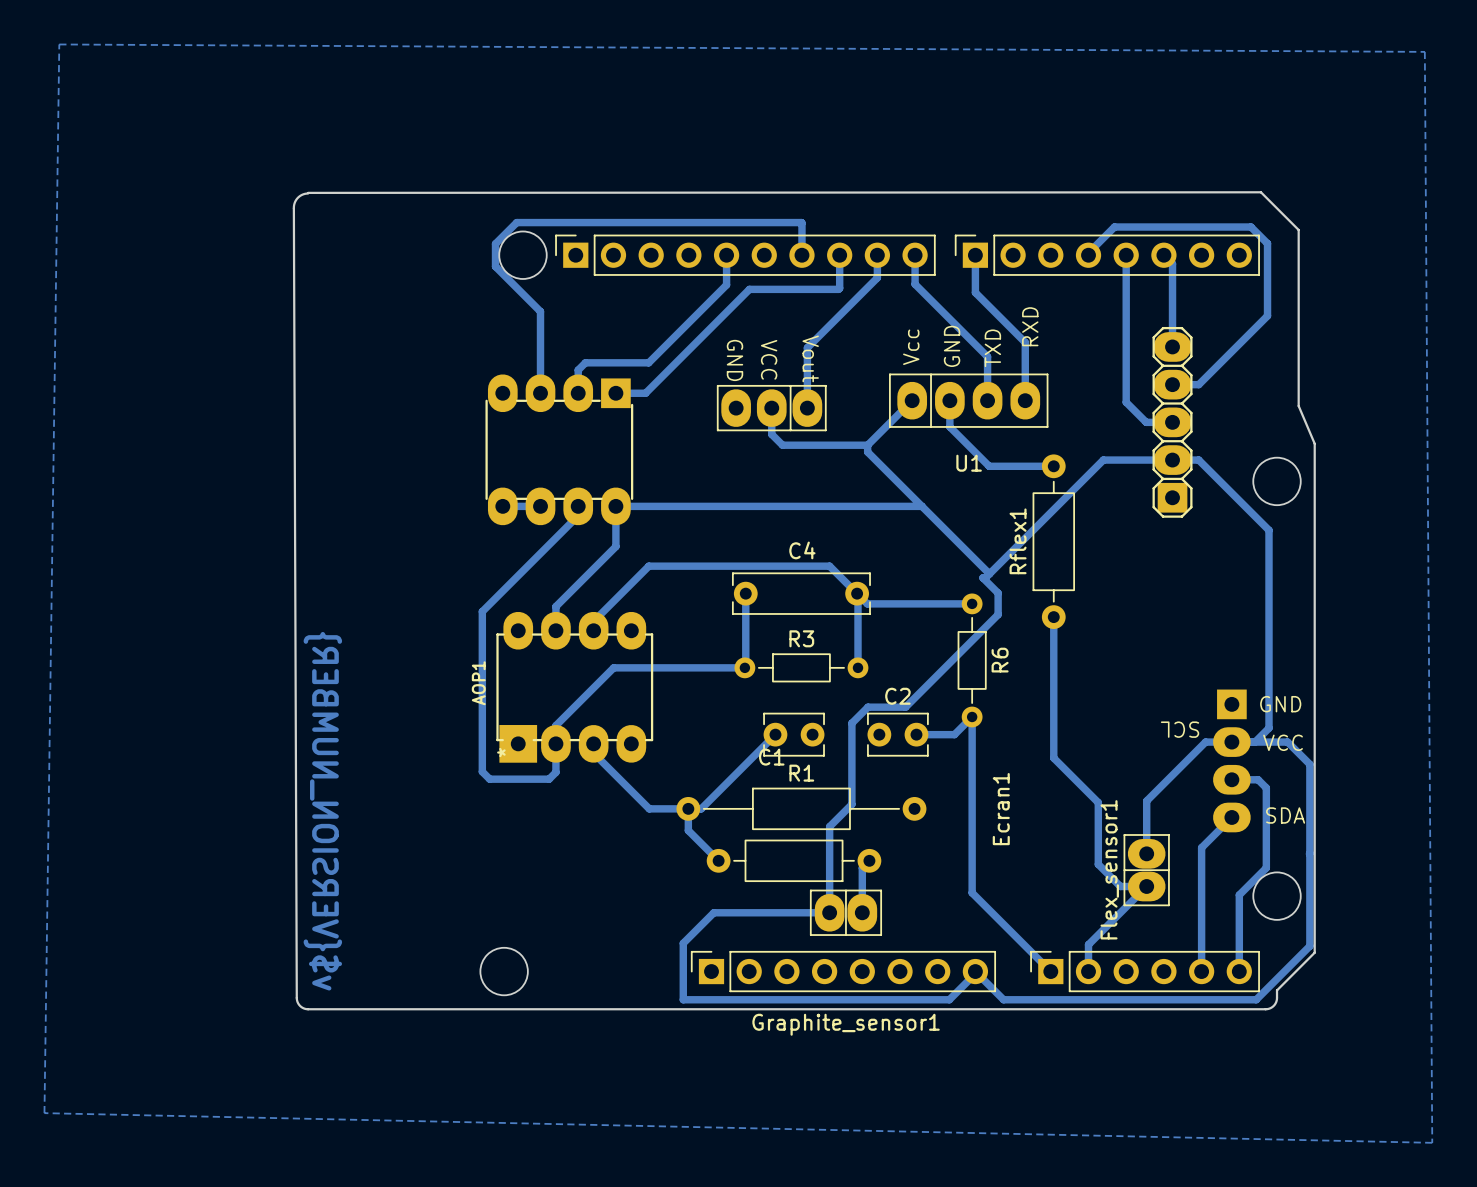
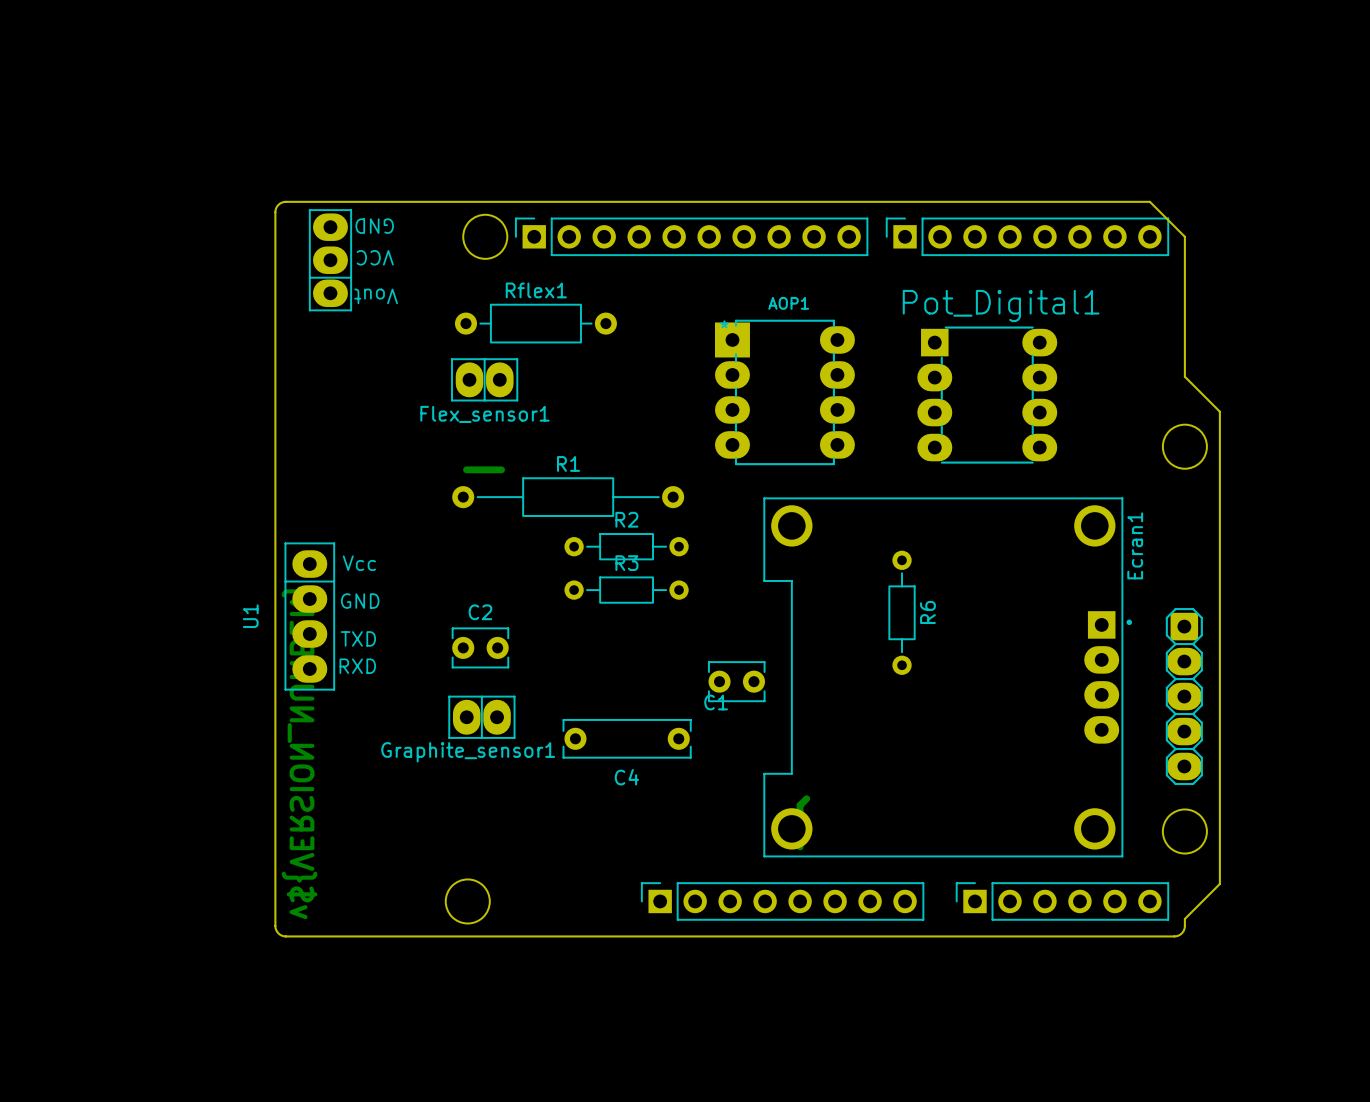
bottom zone outline: (59, 44) (1424, 51) (1432, 1142) (44, 1113) (59, 44) -> none
board edge: (308, 192) (1260, 192) (1298, 229) (1298, 406) (1314, 443) -> (275, 925) (275, 212) (280, 203) (1149, 201) (1184, 236) (1184, 376) (1219, 411)
board edge: (308, 193) (297, 197) (293, 208) (296, 997) -> none
bottom track: (726, 255) (726, 284) (648, 362) (585, 362) (578, 370) (578, 393) -> none
bottom track: (801, 255) (801, 222) (516, 222) (495, 243) (495, 266) (540, 311) (540, 393) -> none
bottom track: (839, 255) (838, 289) (749, 289) (645, 393) (615, 393) -> none
bottom track: (877, 255) (877, 277) (807, 347) (807, 408) -> none
bottom track: (915, 255) (915, 284) (987, 356) (987, 400) -> none
bottom track: (975, 255) (975, 292) (1025, 342) (1025, 400) -> none
bottom track: (1088, 255) (1114, 227) (1251, 227) (1267, 243) (1267, 315) (1198, 384) (1172, 384) -> none
bottom track: (1126, 255) (1126, 402) (1146, 422) (1172, 422) -> none
bottom track: (1163, 255) (1172, 263) (1172, 346) -> none
part: none -> (330, 260)
text: RXD (1030, 326) -> none
bottom track: (912, 400) (867, 445) -> none
bottom track: (949, 400) (949, 426) (989, 466) (1053, 466) -> none
U1 rotation: 0° (968, 400) -> 90° clockwise (309, 616)
U1 position: (968, 400) -> (309, 616)
bottom track: (771, 408) (771, 434) (782, 445) (867, 445) -> none
part: (771, 408) -> none
part rotation: 0° (1172, 422) -> 180° (1184, 696)
part position: (1172, 422) -> (1184, 696)
Pot_Digital1: none -> (987, 395)
bottom track: (867, 445) (867, 452) (989, 573) -> none
part: (559, 449) -> none
bottom track: (578, 506) (578, 515) (482, 611) (482, 771) (489, 779) (549, 779) (555, 772) (555, 725) (613, 667) (744, 667) (745, 593) -> none
bottom track: (921, 506) (615, 506) (615, 546) (555, 606) (555, 630) -> none
Rflex1 rotation: 0° (1053, 541) -> 90° clockwise (535, 323)
Rflex1 position: (1053, 541) -> (535, 323)
C4 name position: C4 (802, 550) -> C4 (626, 777)
R2: none -> (626, 546)
C4 position: (801, 593) -> (627, 738)
bottom track: (858, 594) (858, 667) -> none
bottom track: (972, 603) (867, 603) (829, 566) (648, 566) (593, 621) (593, 630) -> none
bottom track: (1053, 617) (1053, 758) (1098, 802) (1098, 864) (1120, 886) (1146, 886) (1088, 944) (1088, 971) -> none
R3 position: (801, 667) -> (626, 590)
AOP1 rotation: 0° (574, 687) -> 90° clockwise (784, 392)
AOP1 position: (574, 687) -> (784, 392)
Ecran1 footprint: [1213, 689, 1251, 833] -> [763, 497, 1133, 858]
text: none -> RXD (357, 666)
text: SCL (1180, 729) -> none
bottom track: (775, 734) (701, 808) (649, 808) (593, 753) (593, 743) -> none
C2 position: (897, 734) -> (480, 647)
bottom track: (916, 734) (954, 734) (972, 716) (972, 892) (1050, 971) -> none
bottom track: (1255, 742) (1269, 728) (1269, 530) (1198, 460) (1103, 460) (985, 577) (982, 577) (998, 593) (998, 614) (905, 707) (867, 707) (851, 723) (851, 804) (829, 826) (829, 912) (713, 912) (683, 943) (683, 999) (949, 999) (975, 971) (1003, 999) (1256, 999) (1309, 946) (1309, 764) (1287, 742) (1205, 742) (1146, 801) (1146, 853) -> none
bottom track: (1231, 779) (1258, 779) (1266, 787) (1266, 867) (1239, 894) (1239, 971) -> none
bottom track: (688, 808) (688, 830) (718, 860) -> none
R1 position: (801, 808) -> (568, 497)
Ecran1 name position: Ecran1 (1001, 809) -> Ecran1 (1135, 545)
bottom track: (1231, 817) (1201, 847) (1201, 971) -> none
part: (794, 860) -> none
Flex_sensor1 name position: Flex_sensor1 (1109, 869) -> Flex_sensor1 (484, 414)
Flex_sensor1 rotation: 0° (1146, 870) -> 90° clockwise (484, 379)
Flex_sensor1 position: (1146, 870) -> (484, 379)
Graphite_sensor1 position: (845, 912) -> (481, 717)
Graphite_sensor1 name position: Graphite_sensor1 (846, 1024) -> Graphite_sensor1 (468, 752)

